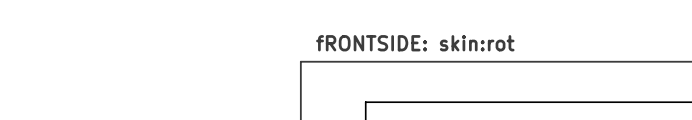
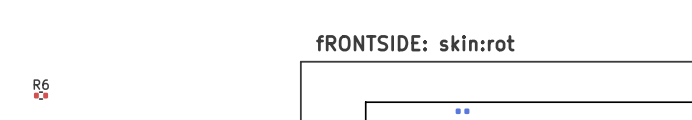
R6: none -> (41, 95)
part: none -> (462, 111)

